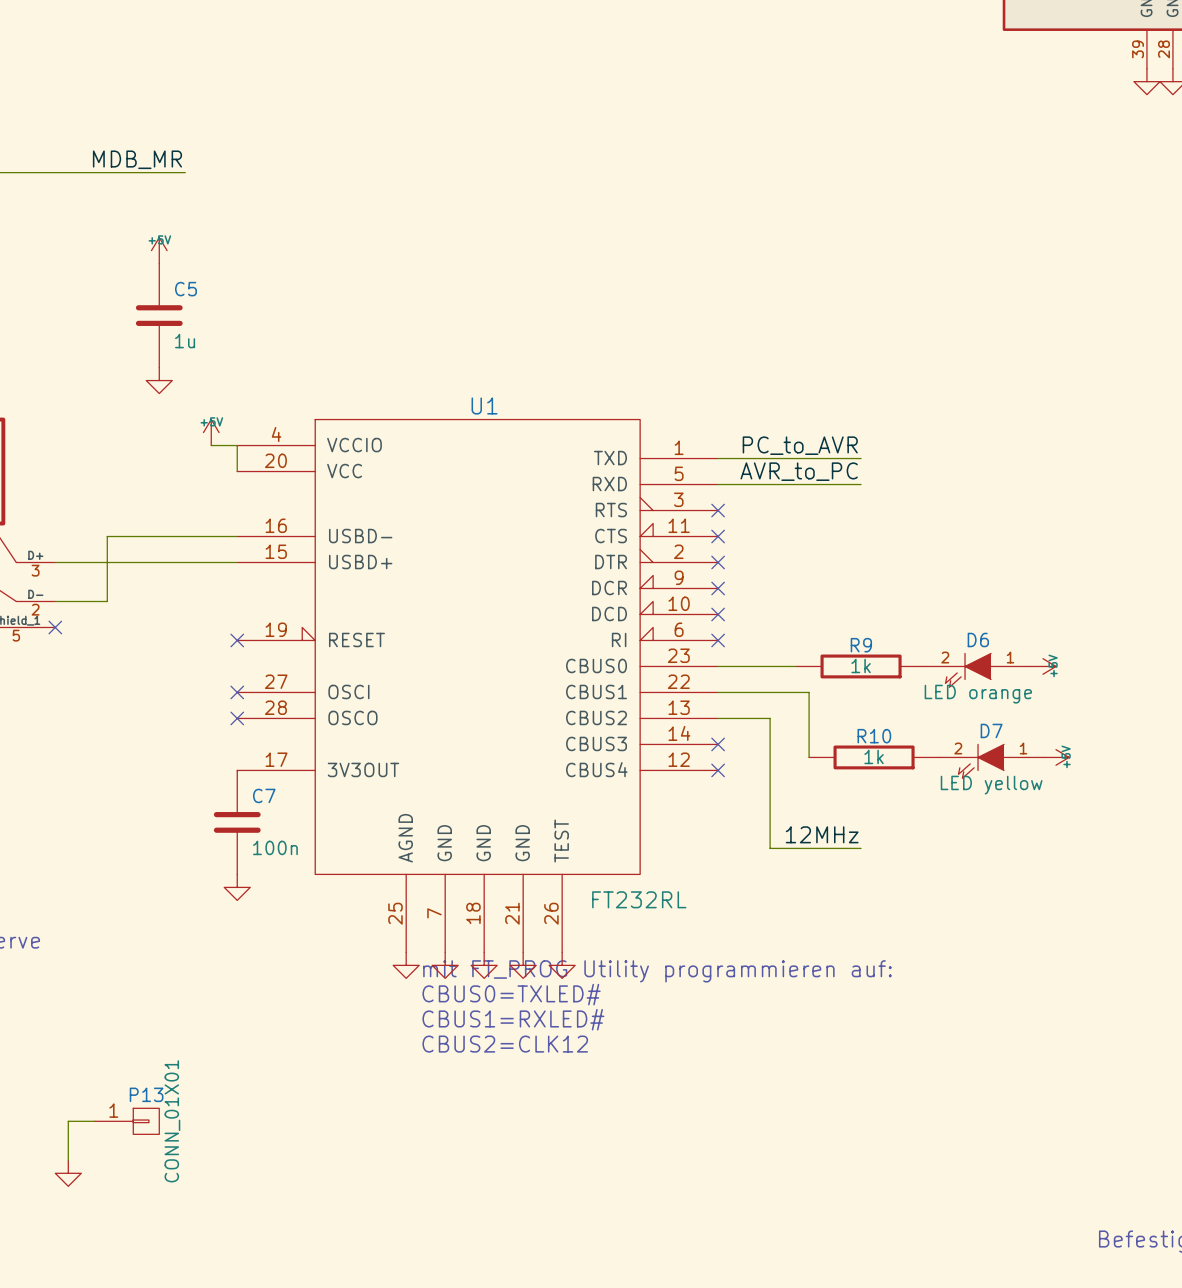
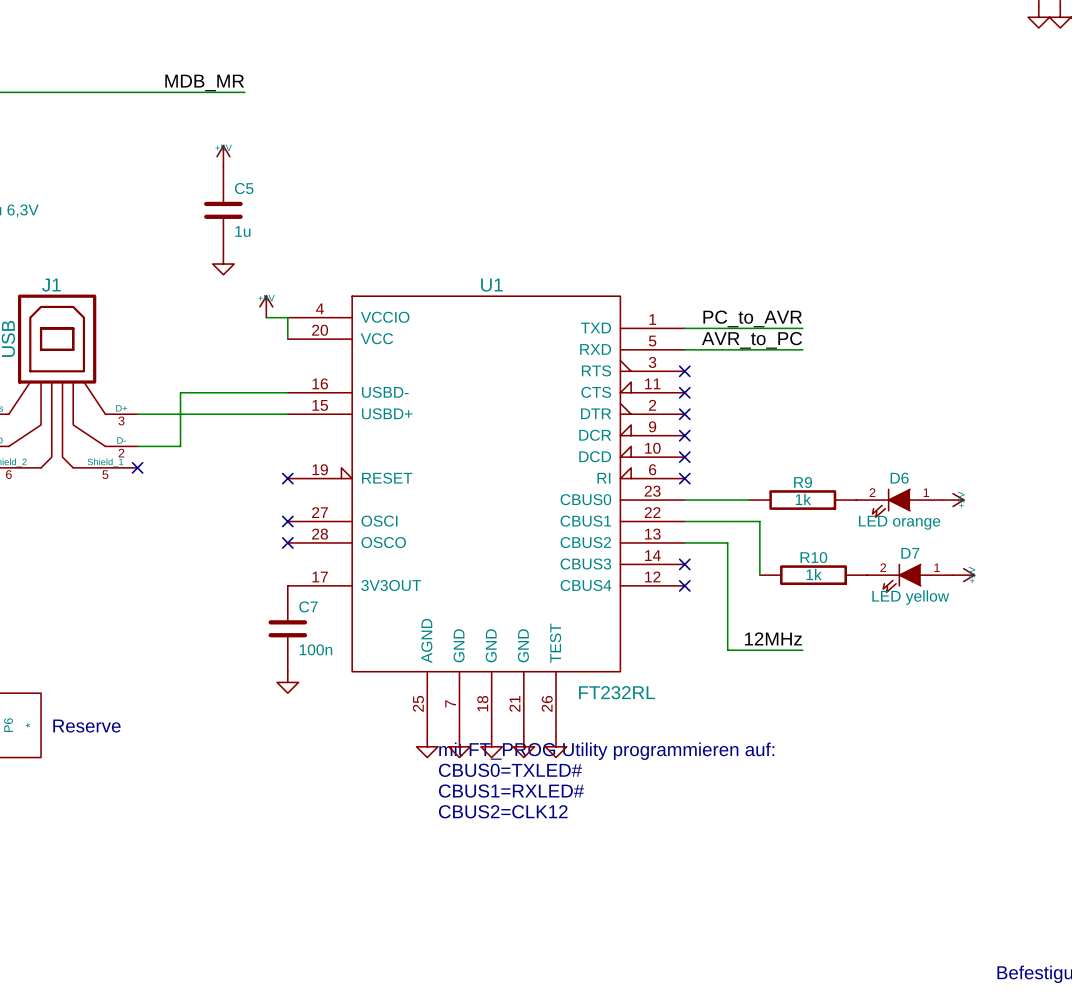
wire: (94, 1121) (68, 1121) (68, 1160) -> none
P13: CONN_01X01 (126, 1121) -> none
power symbol: (68, 1173) -> none

